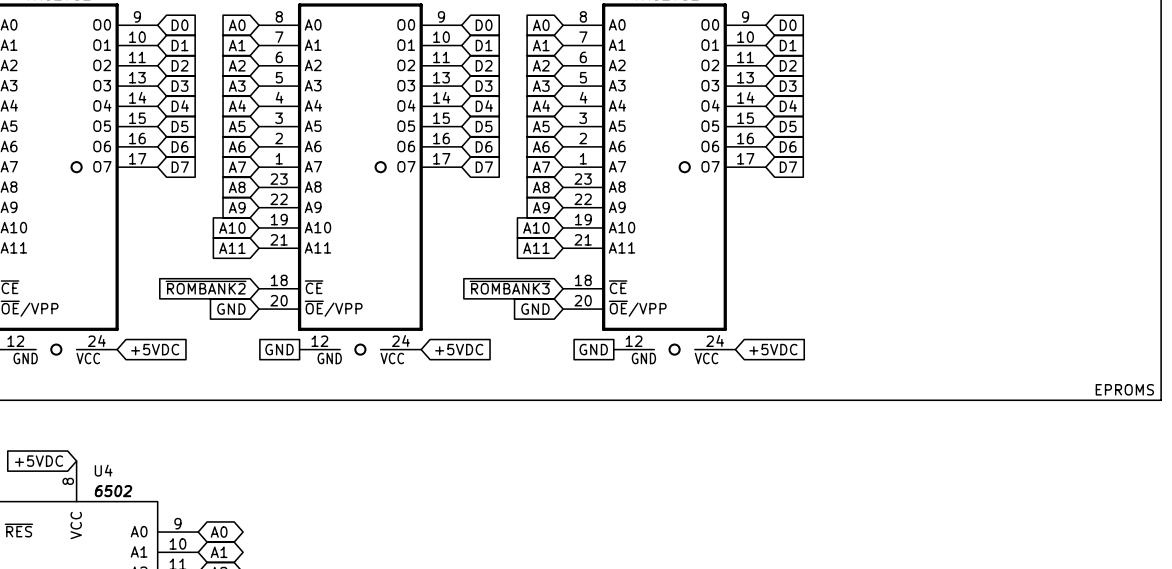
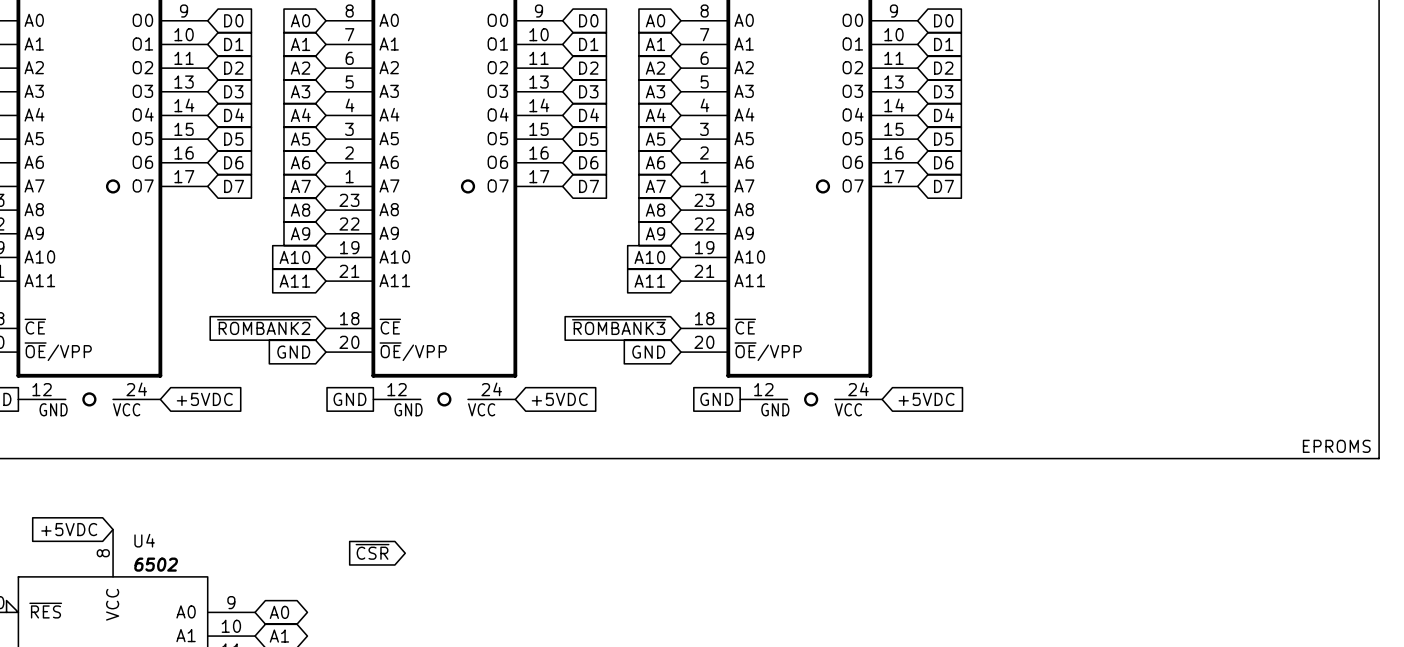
global label: none -> ~{CSR} (372, 551)

